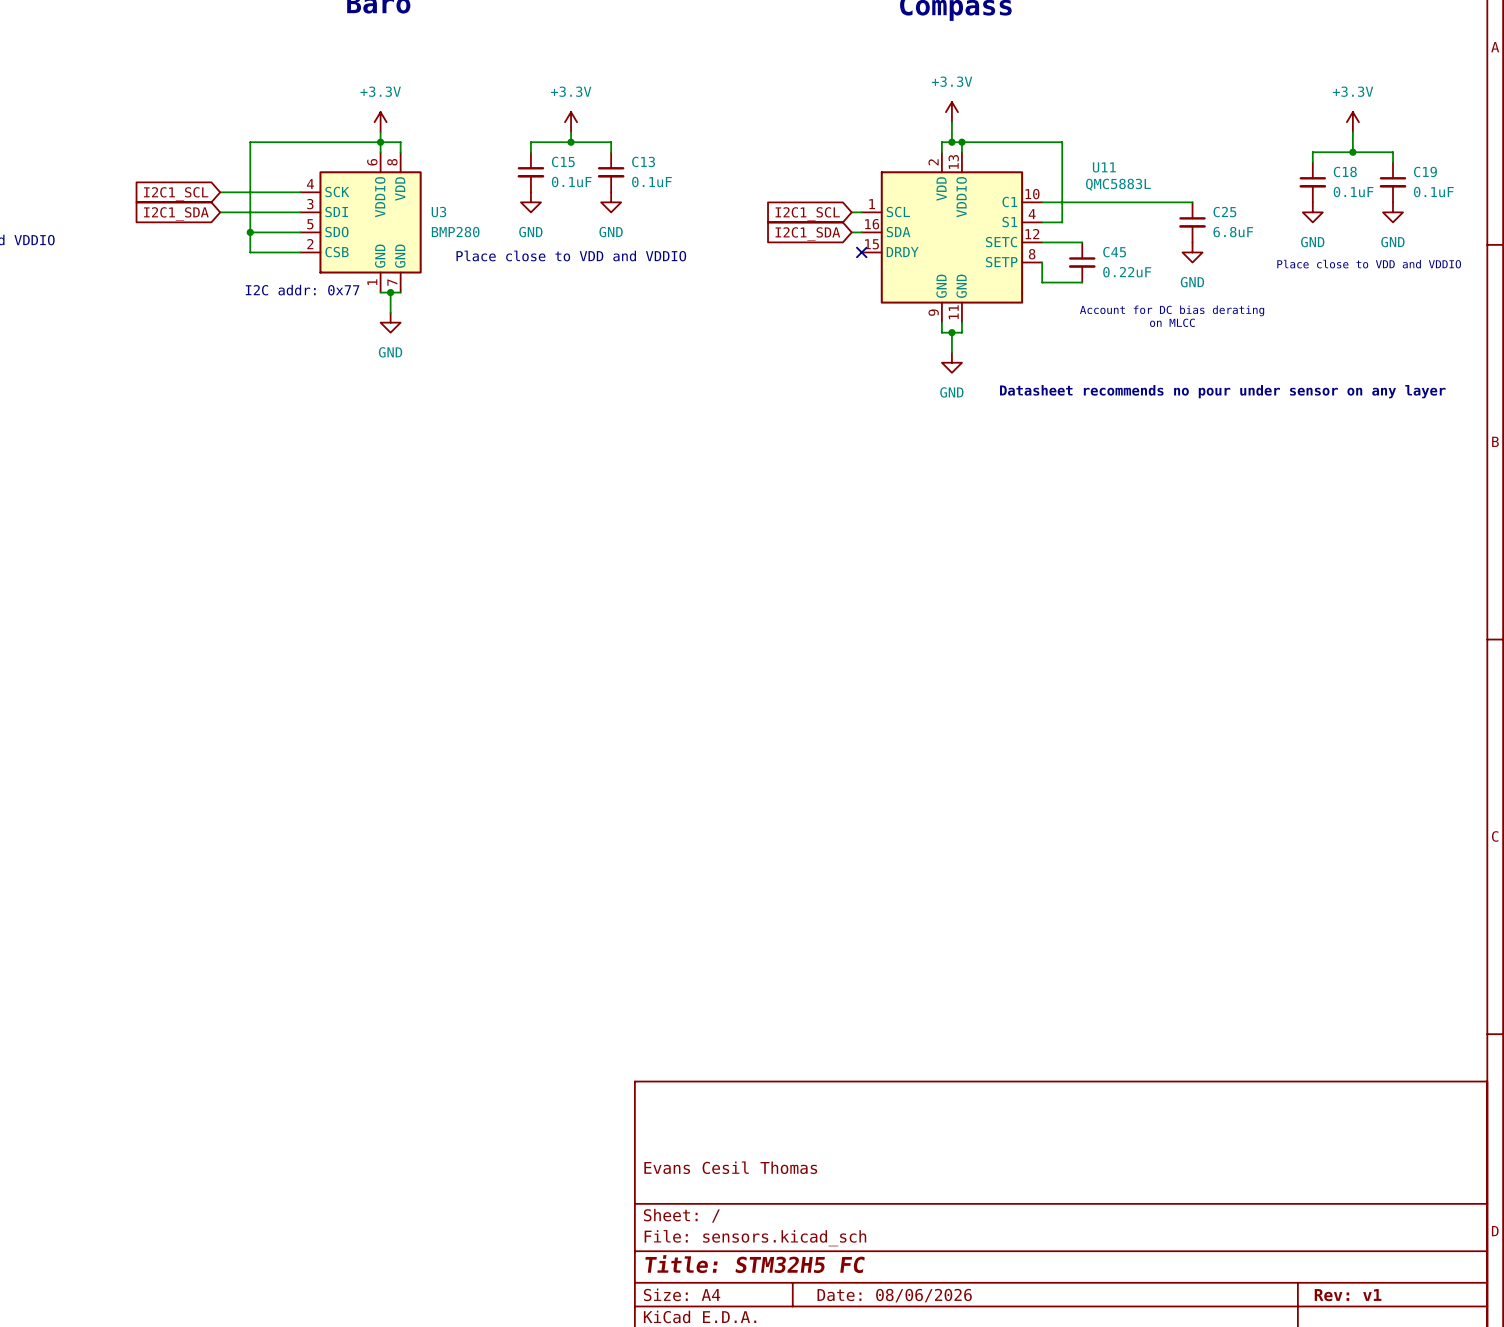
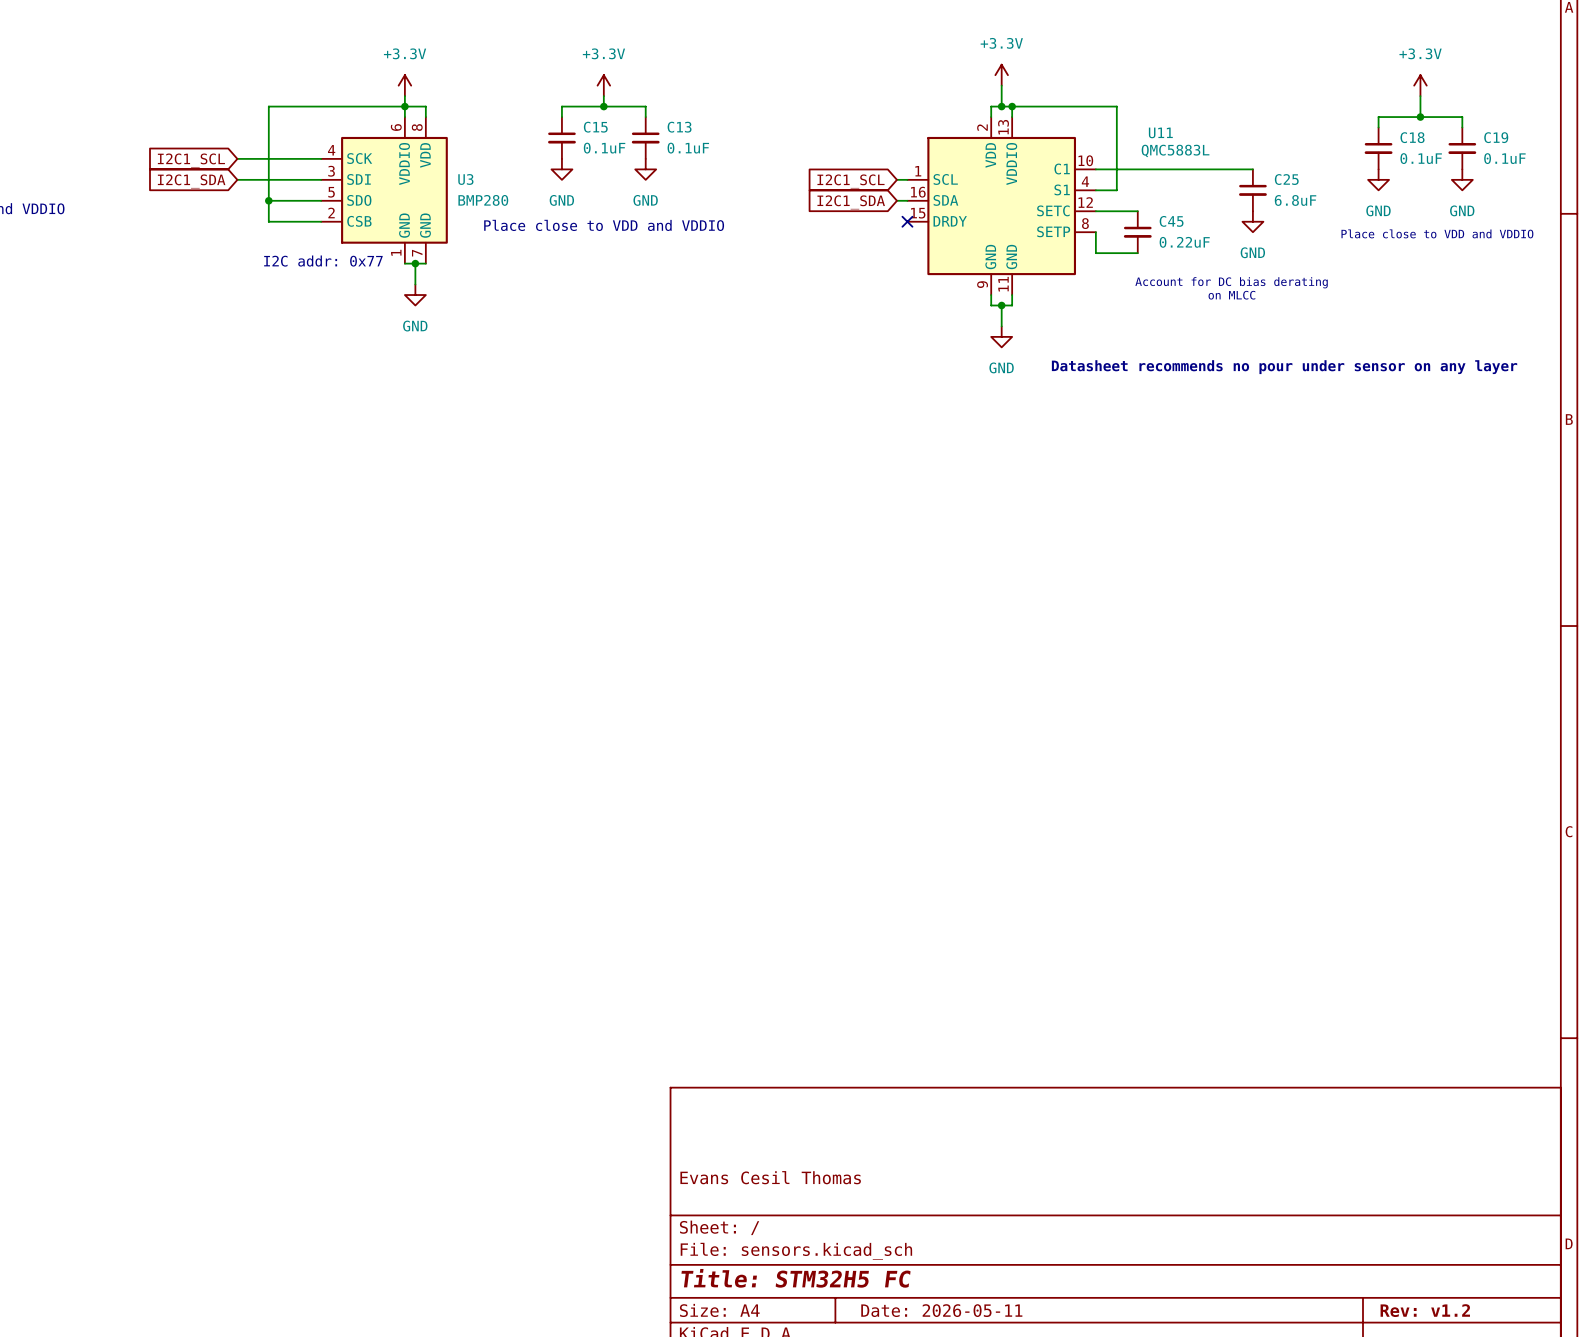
title block: Date: 08/06/2026 (894, 1295) -> Date: 2026-05-11 (941, 1310)
title block: Rev: v1 (1348, 1295) -> Rev: v1.2 (1425, 1310)

